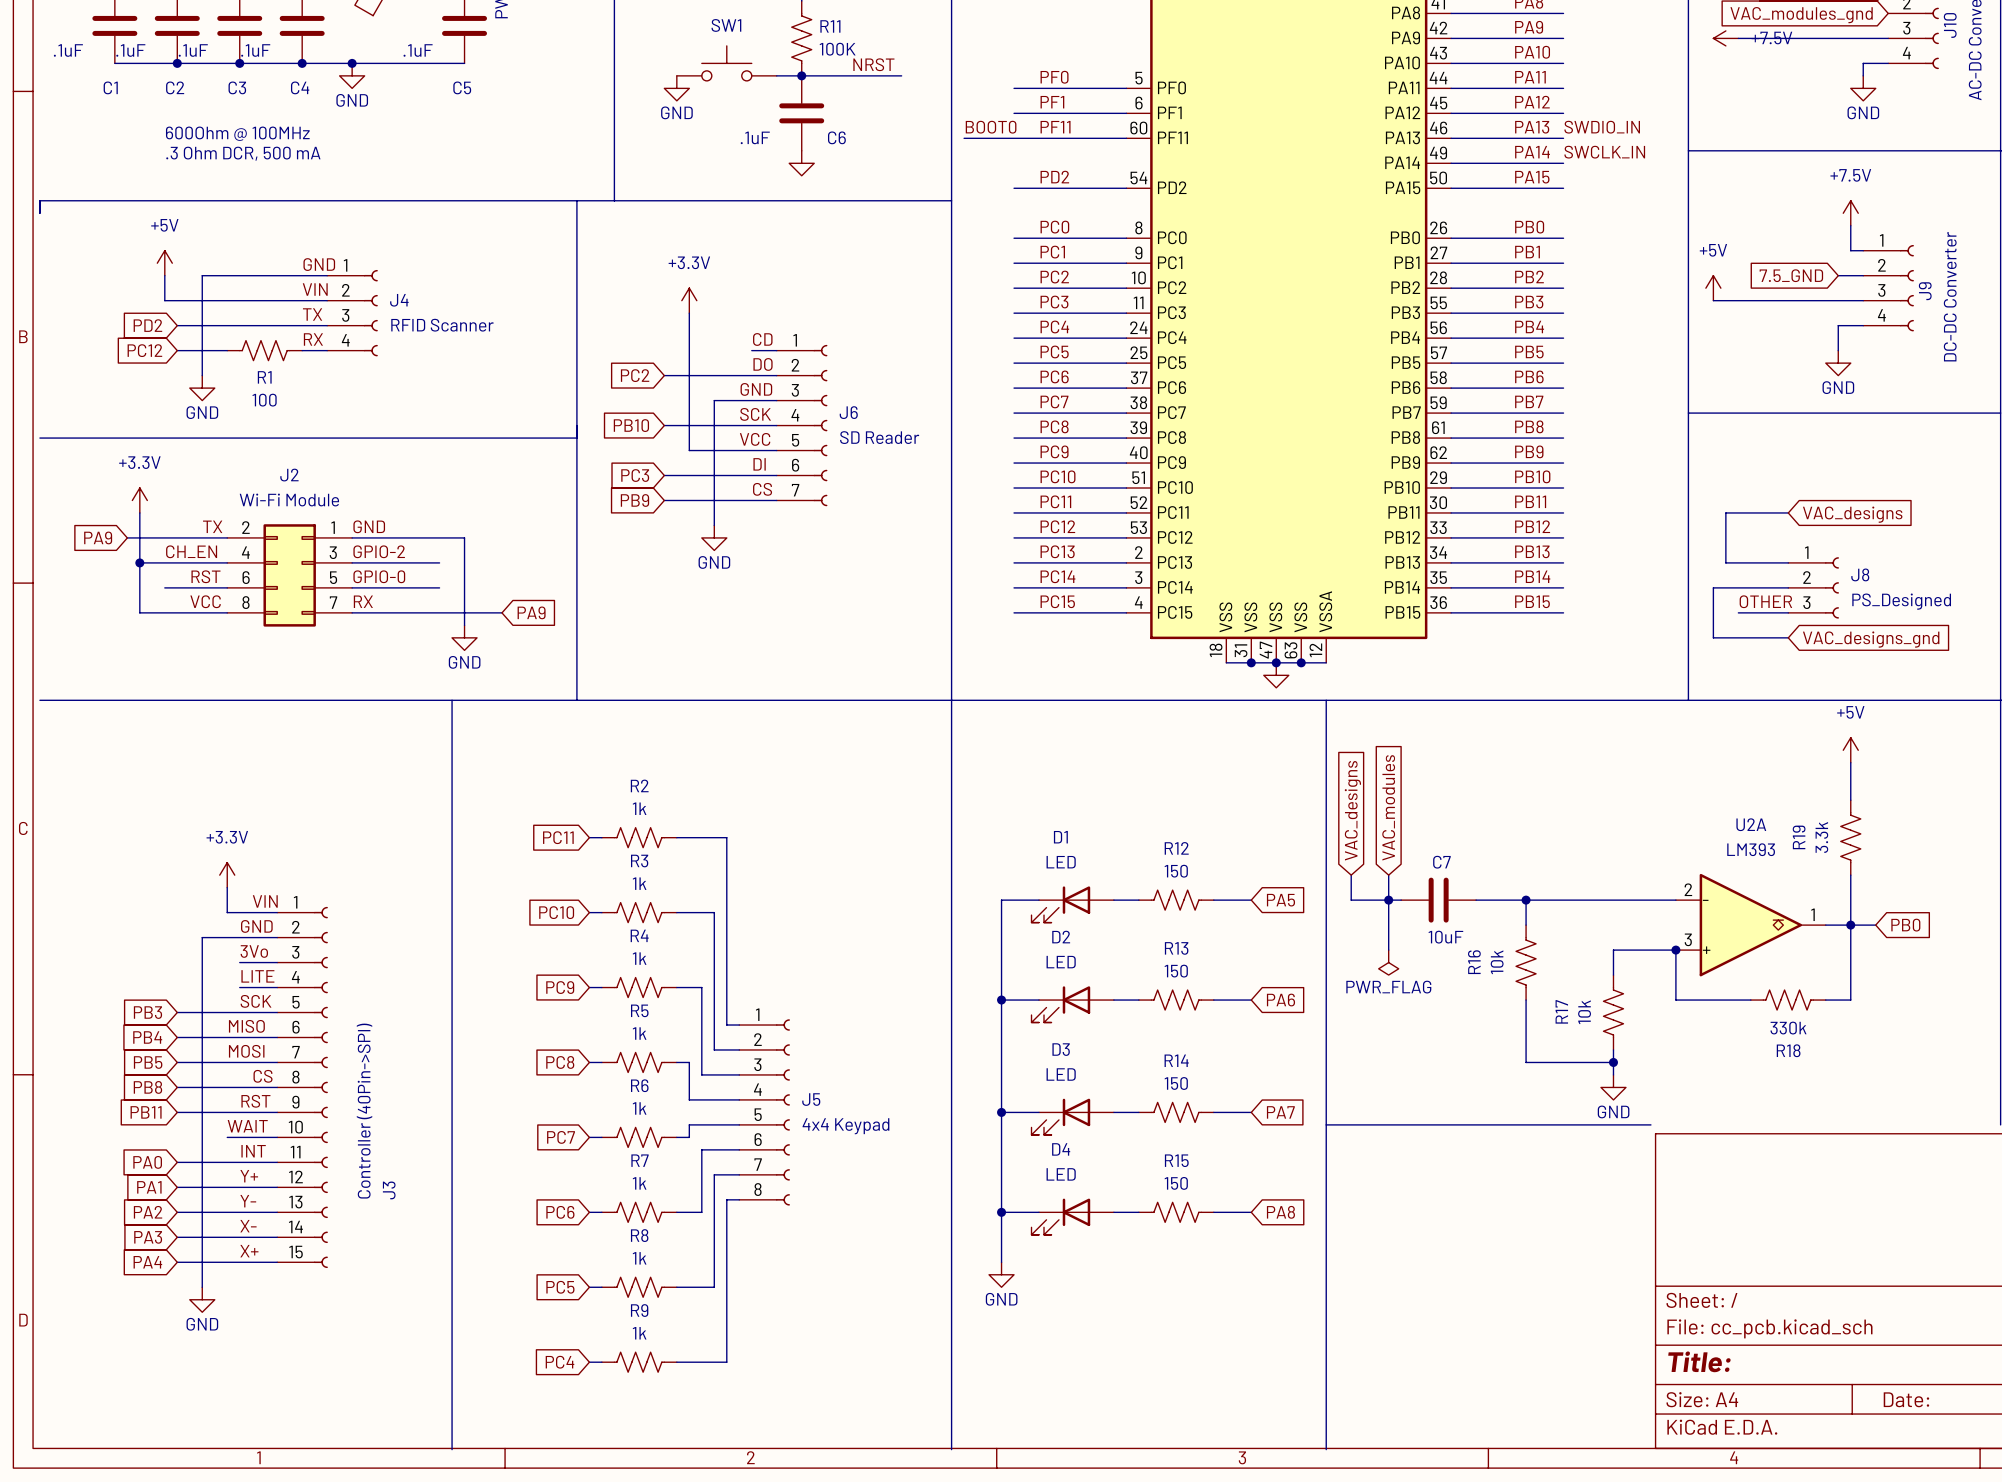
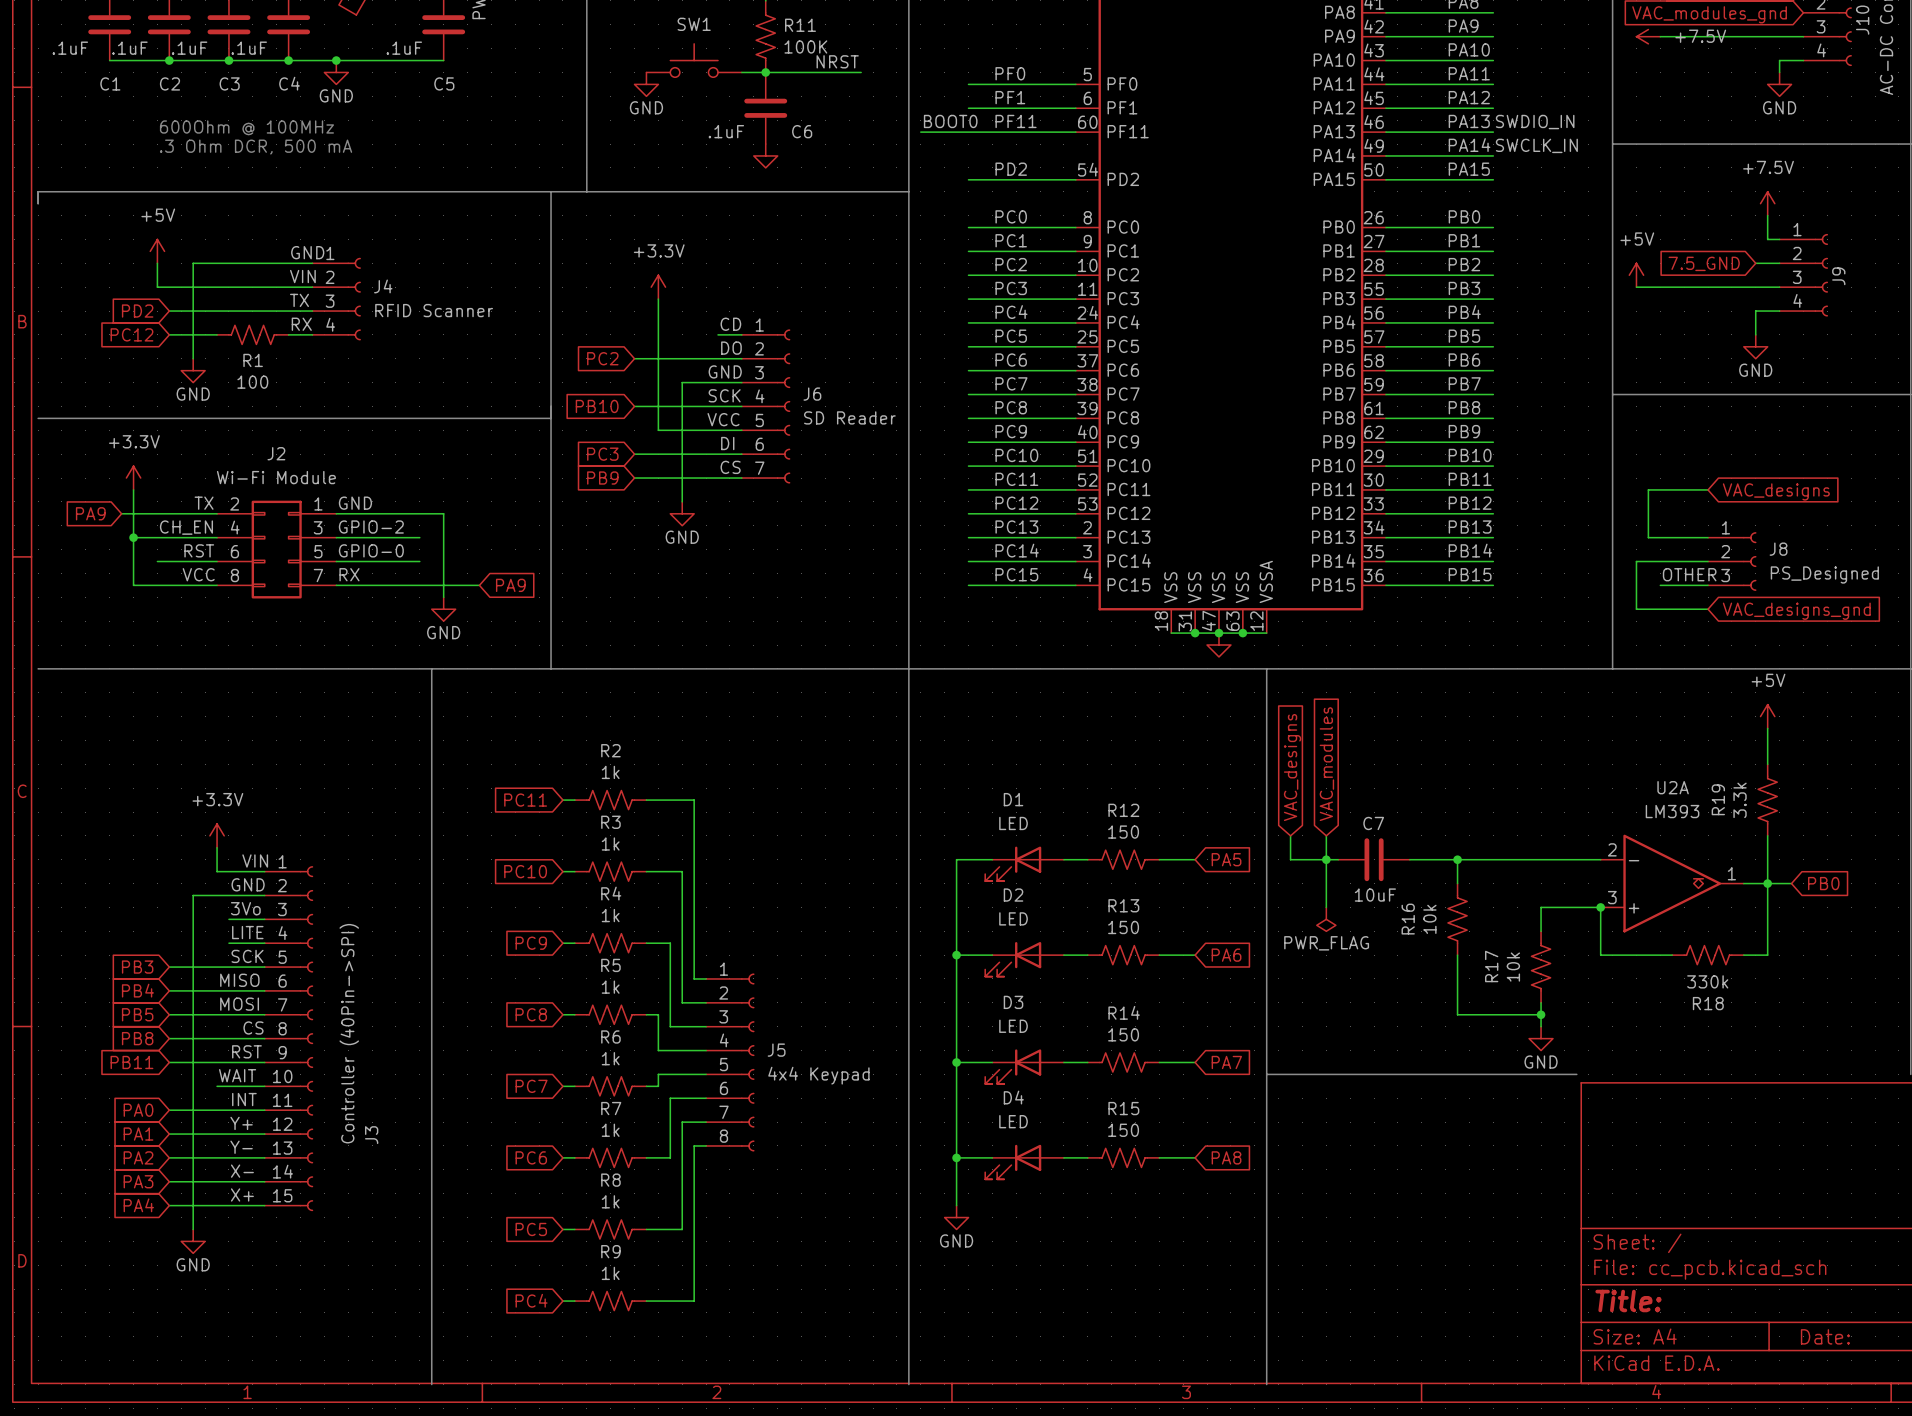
J9 value: DC-DC Converter (1950, 296) -> none

